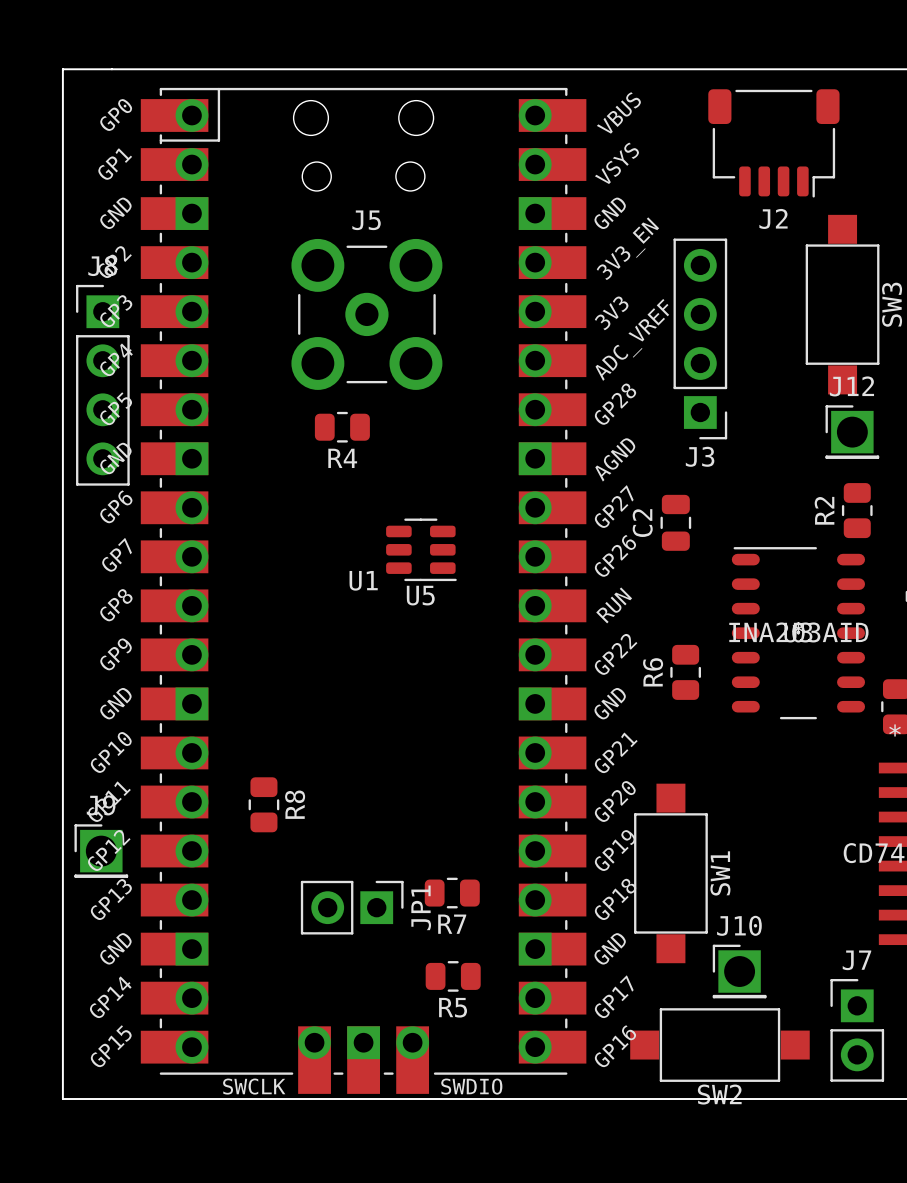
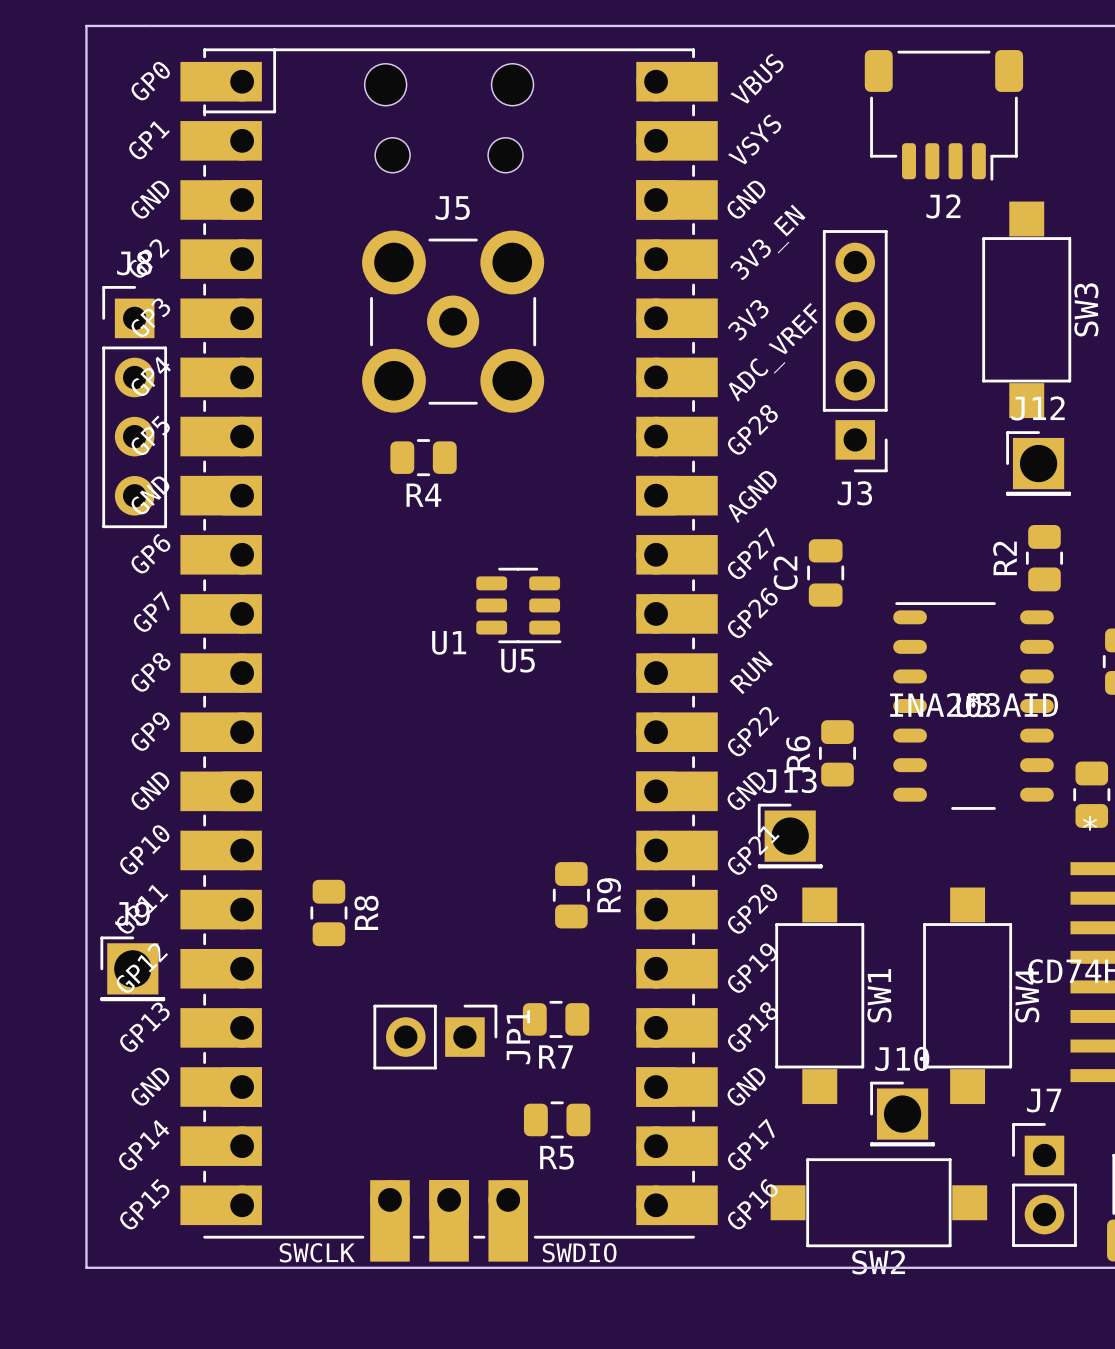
J13: none -> (790, 836)
R9: none -> (571, 895)
SW4: none -> (967, 995)

